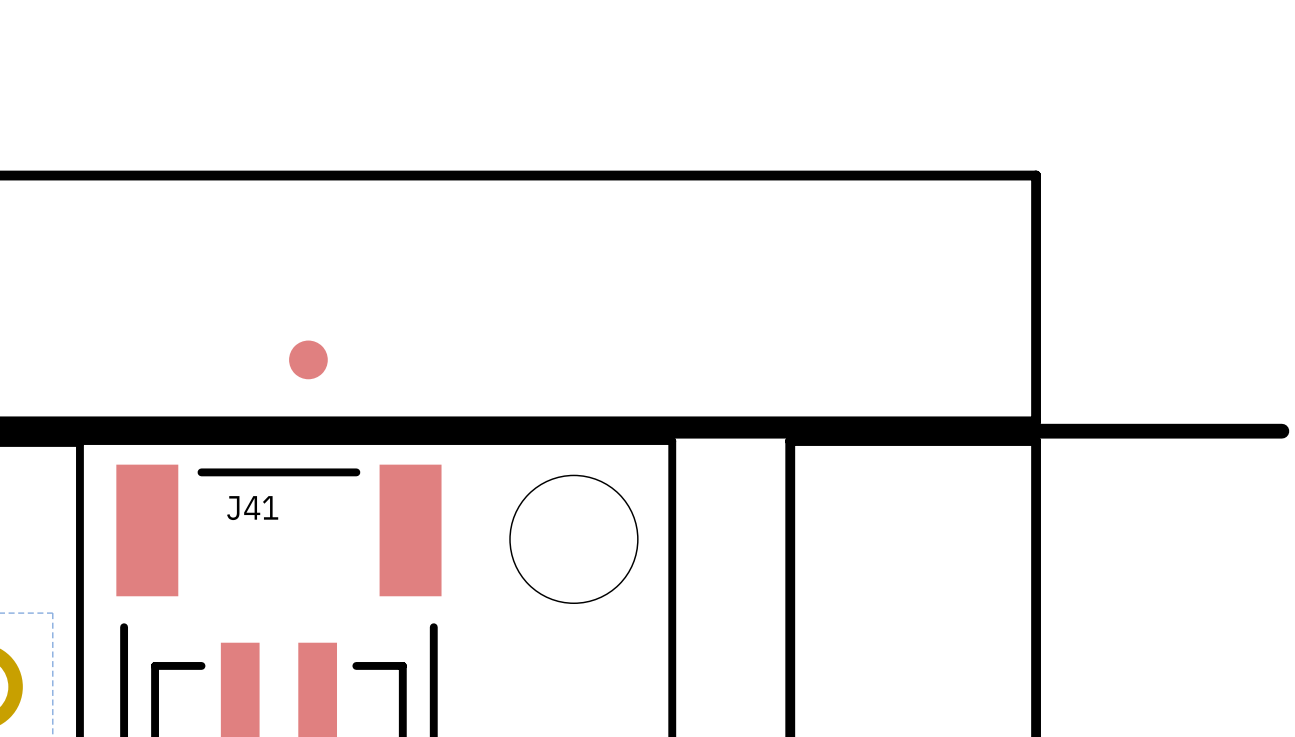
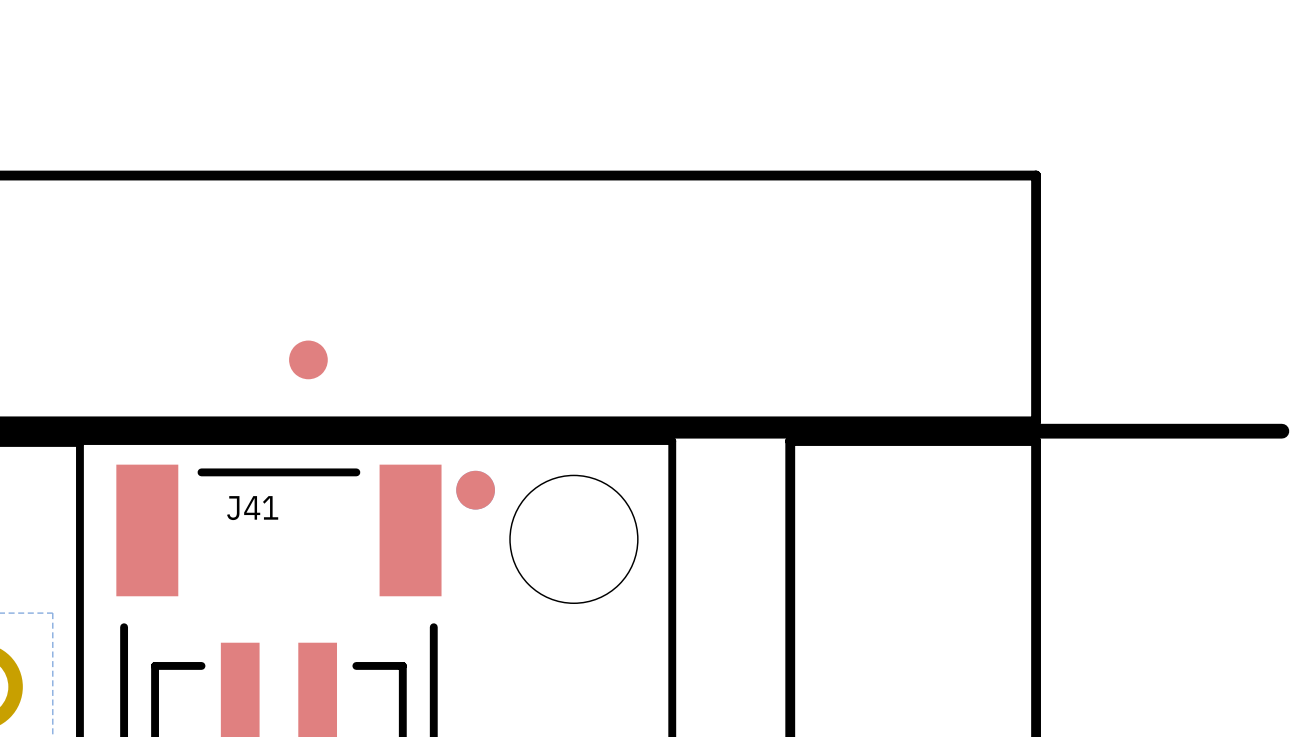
part: none -> (475, 490)

